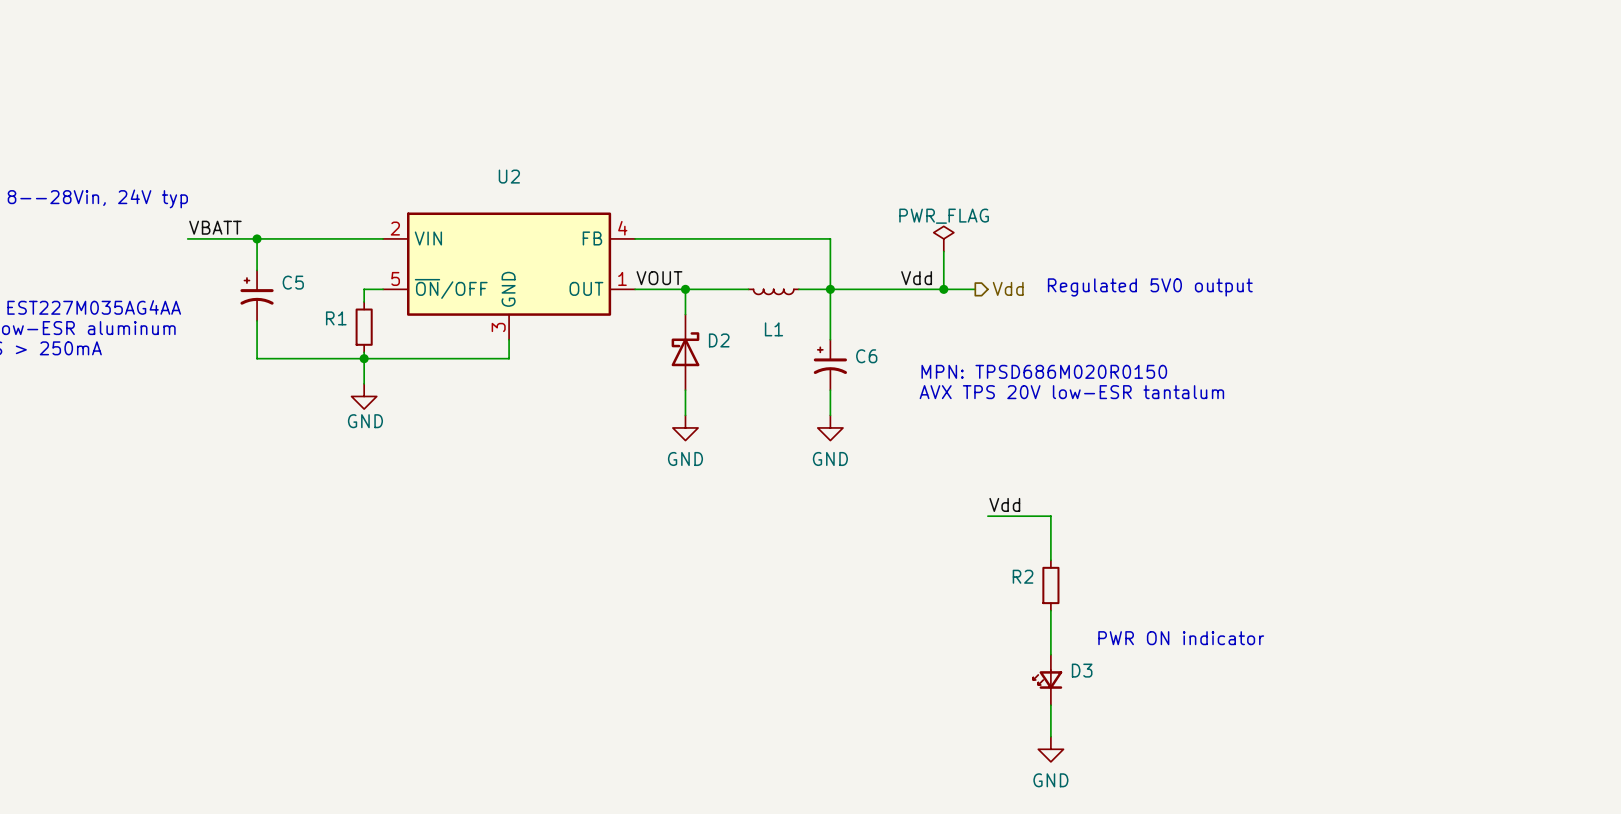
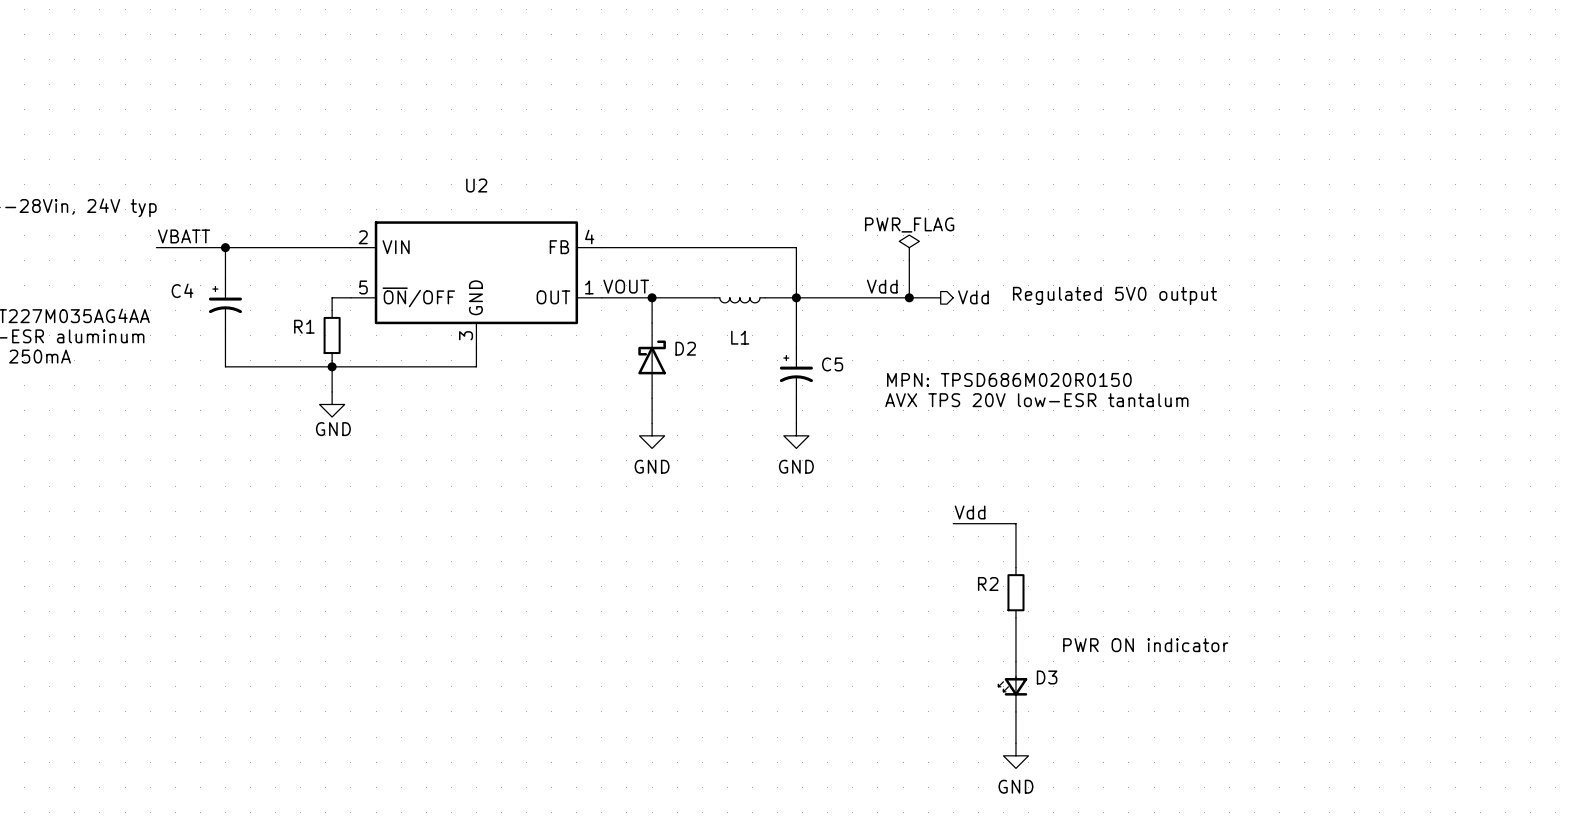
C5 name: C5 (293, 282) -> C4 (182, 290)
C6 name: C6 (866, 356) -> C5 (832, 364)

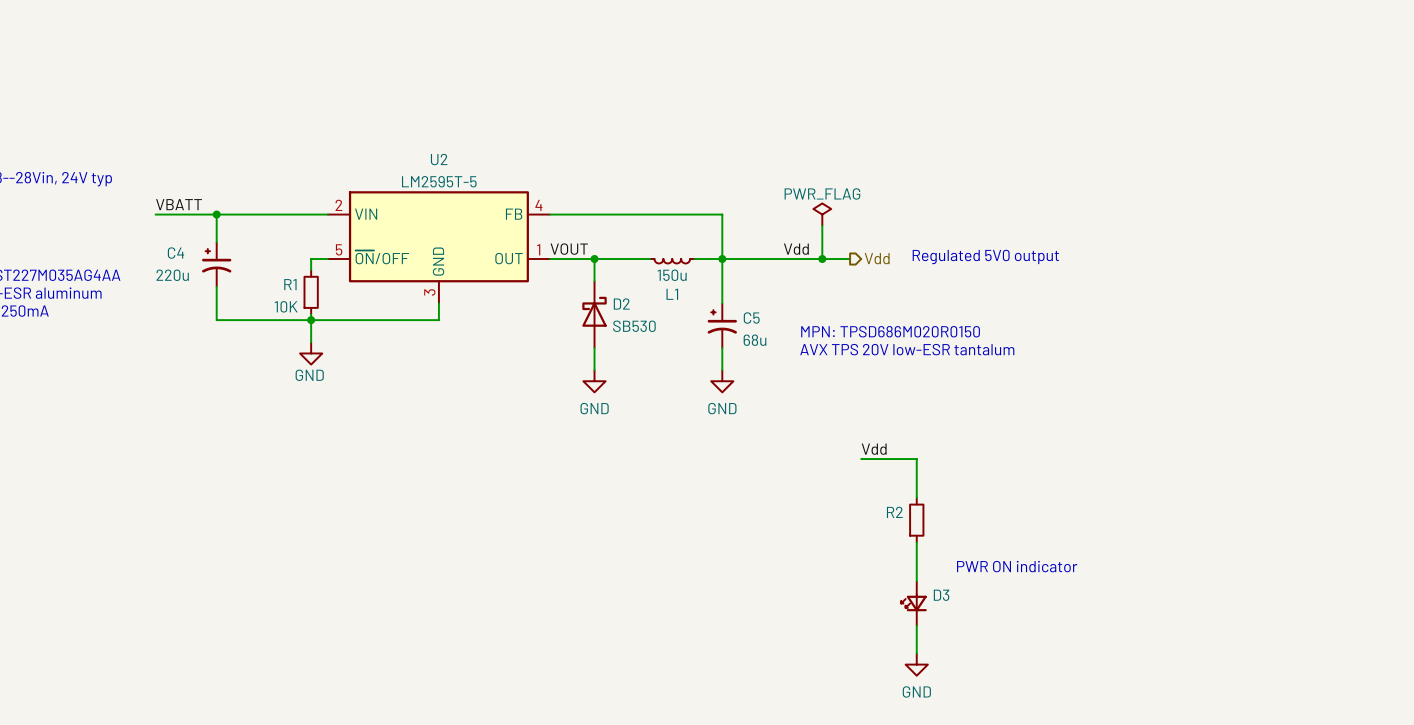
U2 value: none -> LM2595T-5 (439, 181)
C4 value: none -> 220u (172, 275)
L1 value: none -> 150u (672, 275)
R1 value: none -> 10K (286, 306)
D2 value: none -> SB530 (634, 326)
C5 value: none -> 68u (755, 340)

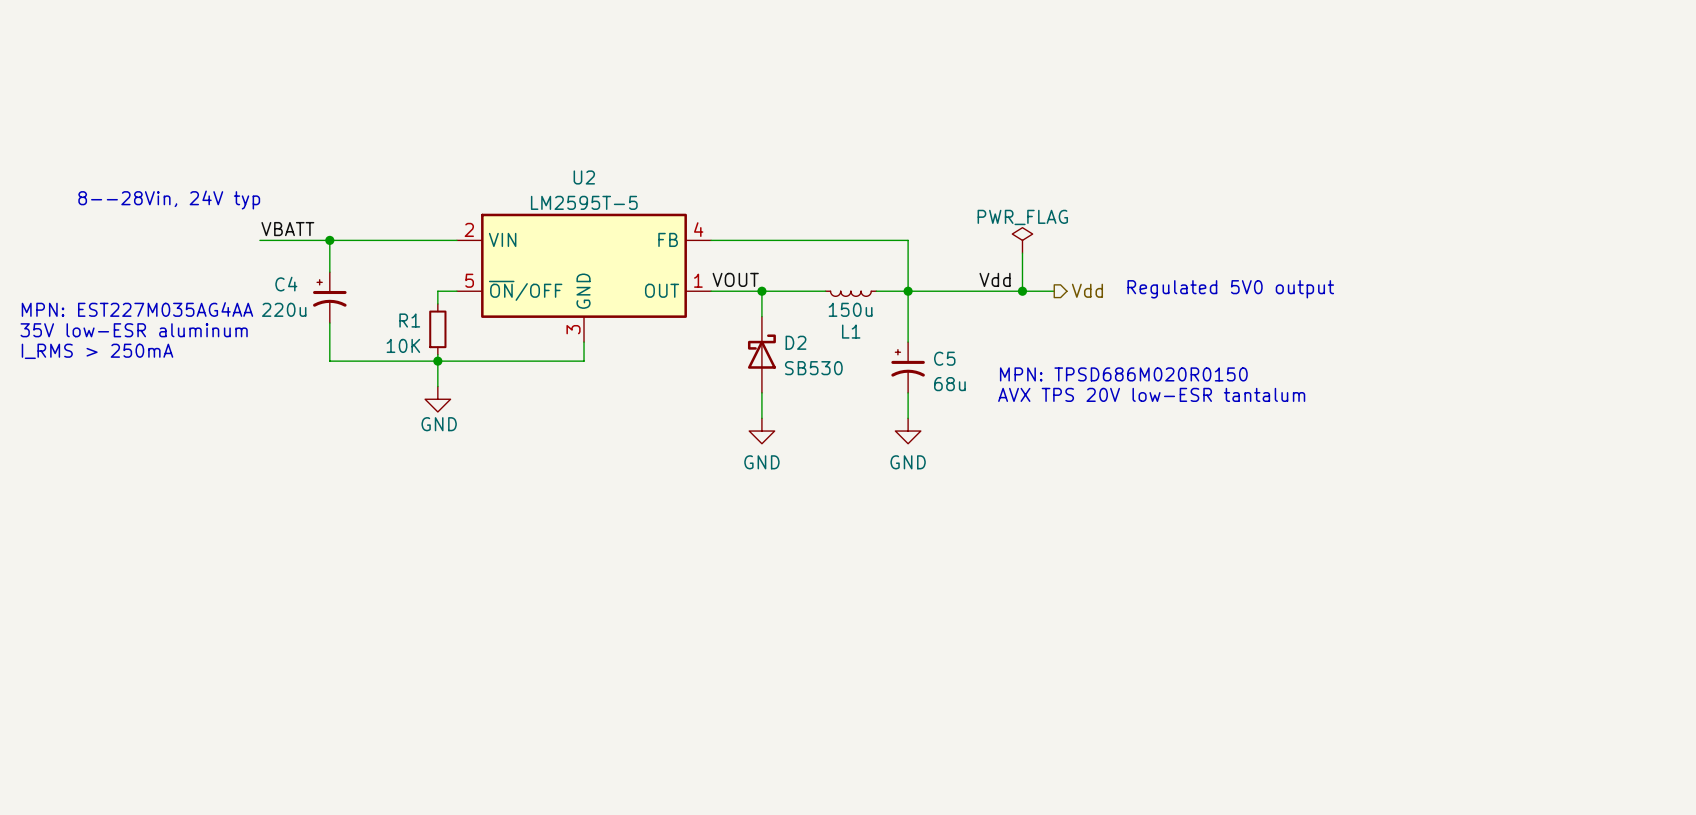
label: Vdd (874, 449) -> none
wire: (861, 459) (916, 459) (916, 497) -> none
R2: (916, 520) -> none
wire: (916, 542) (916, 581) -> none
text: PWR ON indicator (1017, 566) -> none
D3: (913, 603) -> none
wire: (916, 625) (916, 653) -> none
power symbol: GND (916, 664) -> none

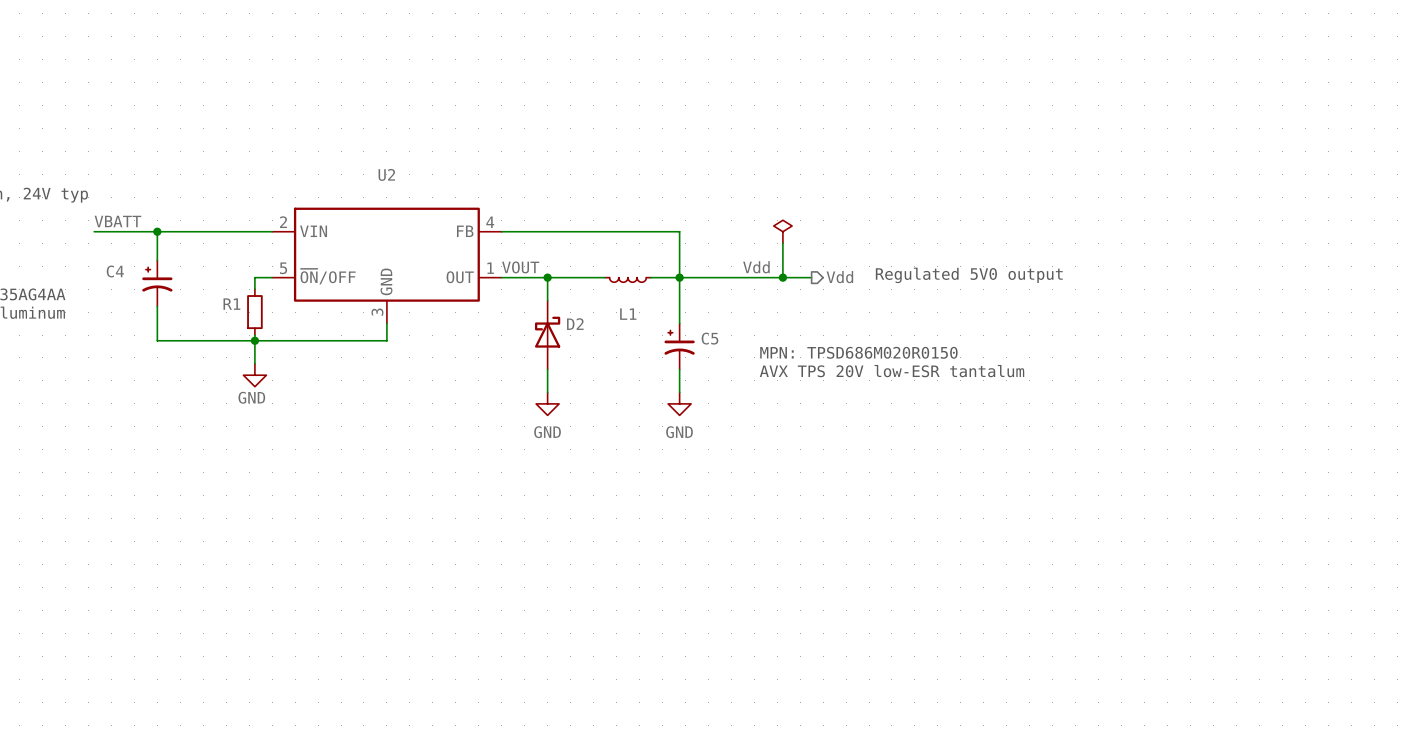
U2 value: LM2595T-5 (584, 202) -> none
power symbol text: PWR_FLAG (1022, 217) -> none
C4 value: 220u (284, 309) -> none
L1 value: 150u (850, 309) -> none
R1 value: 10K (403, 345) -> none
D2 value: SB530 (813, 368) -> none
C5 value: 68u (949, 384) -> none

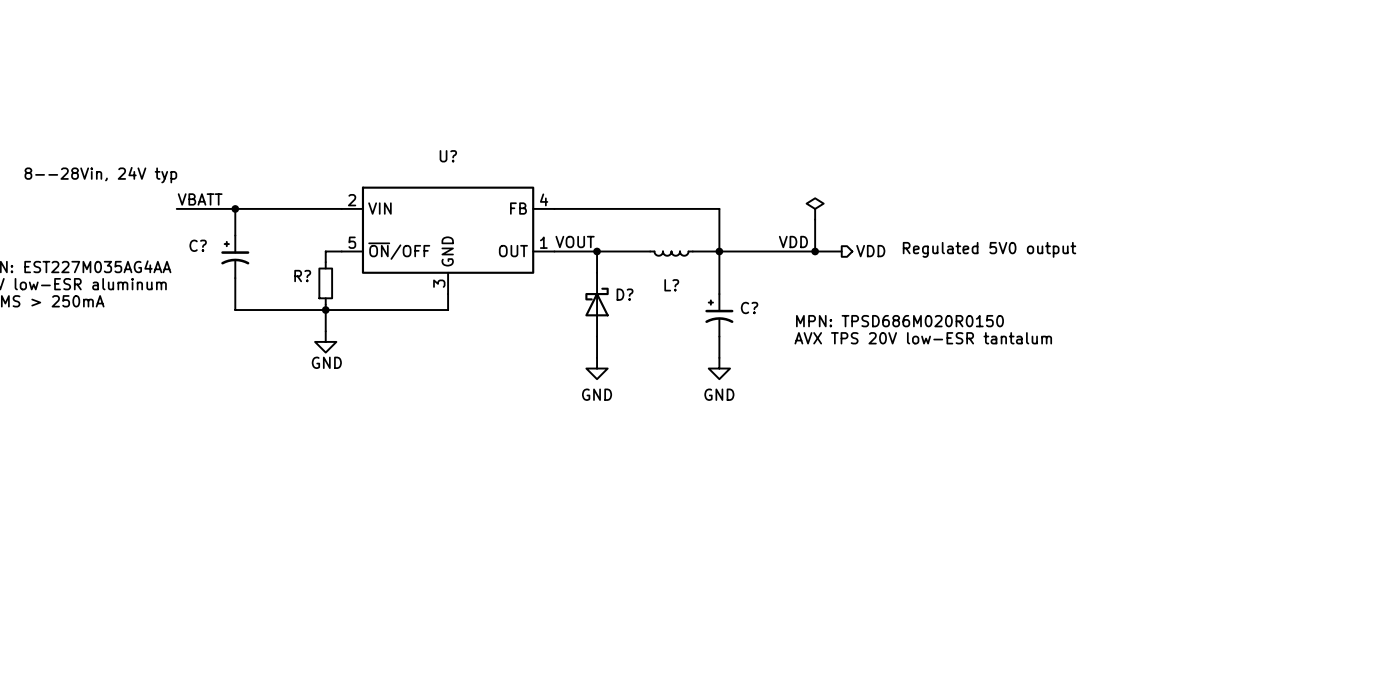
U2 name: U2 (386, 174) -> U? (448, 156)
label: Vdd (756, 267) -> VDD (793, 242)
C4 name: C4 (115, 271) -> C? (198, 245)
hierarchical label: Vdd (839, 277) -> VDD (870, 251)
R1 name: R1 (231, 304) -> R? (302, 276)
L1 name: L1 (628, 314) -> L? (671, 285)
D2 name: D2 (575, 324) -> D? (625, 294)
C5 name: C5 (710, 338) -> C? (749, 307)

